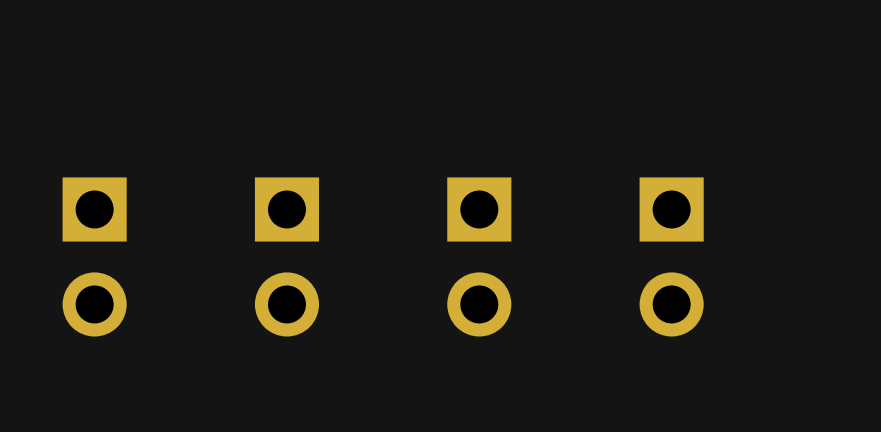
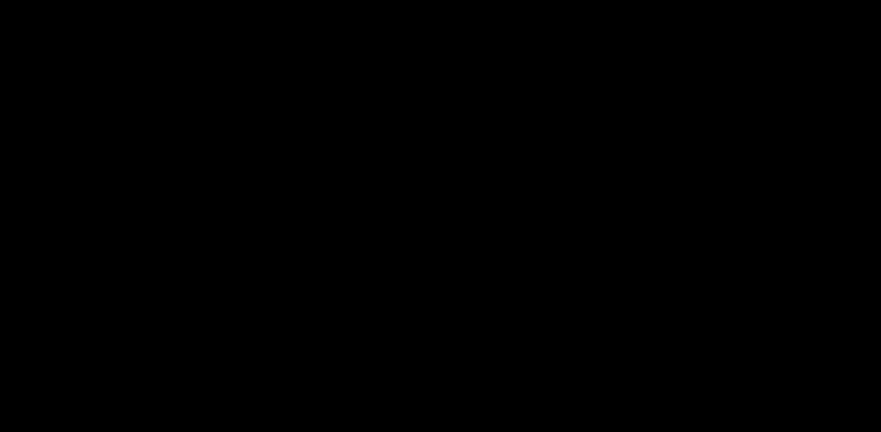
part: (94, 256) -> none
part: (286, 256) -> none
part: (479, 256) -> none
part: (671, 256) -> none

